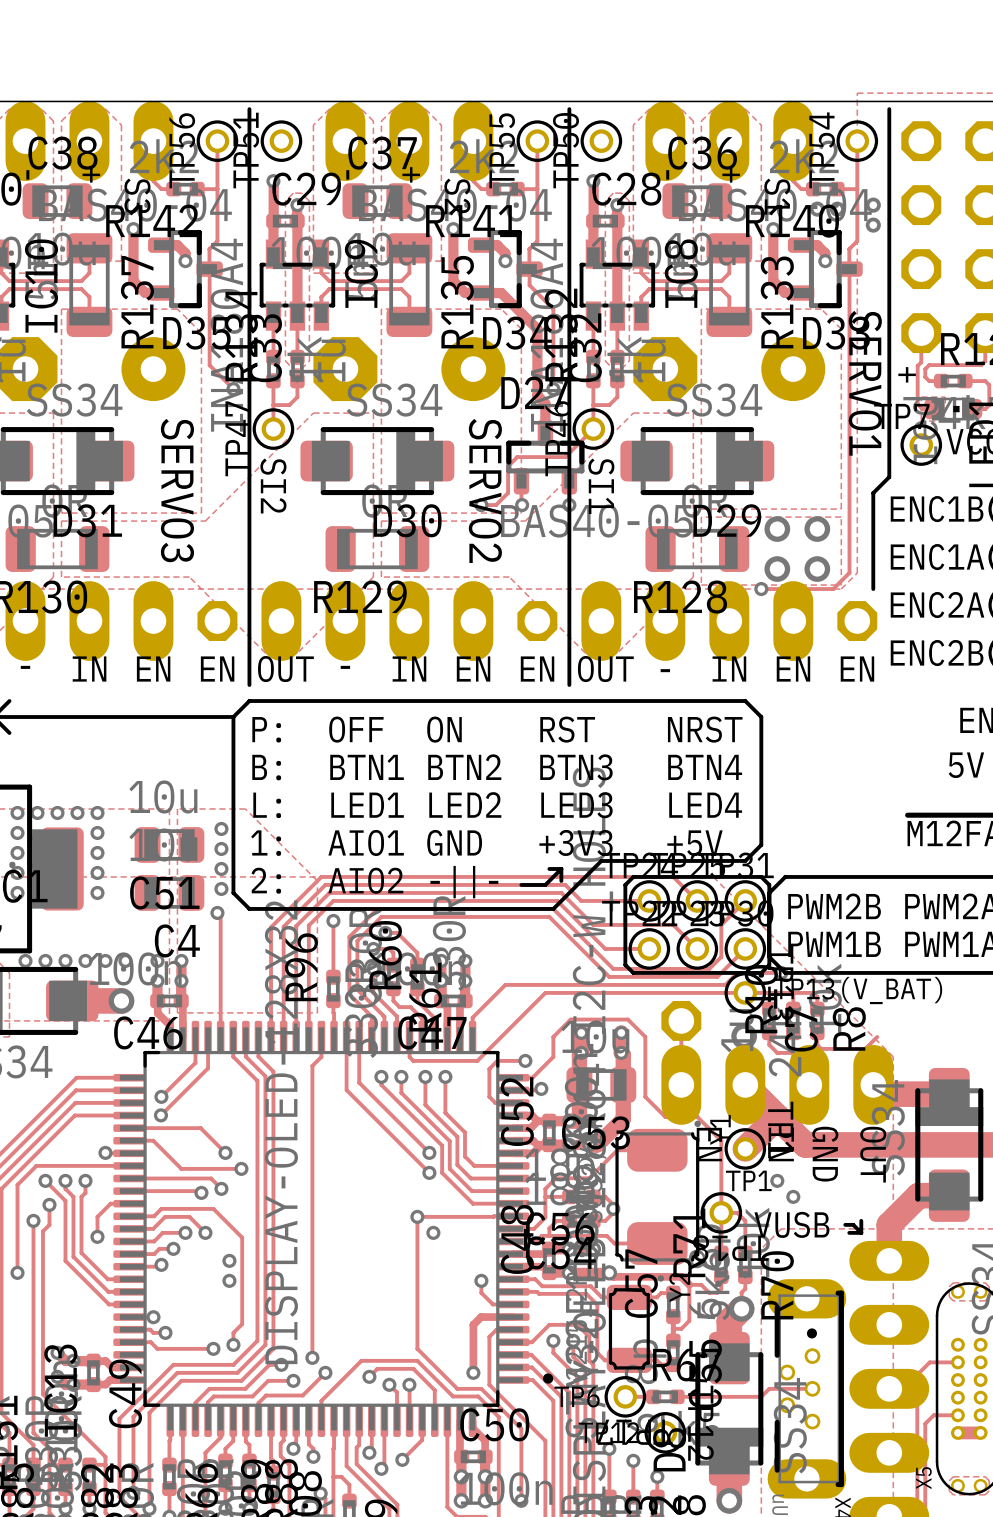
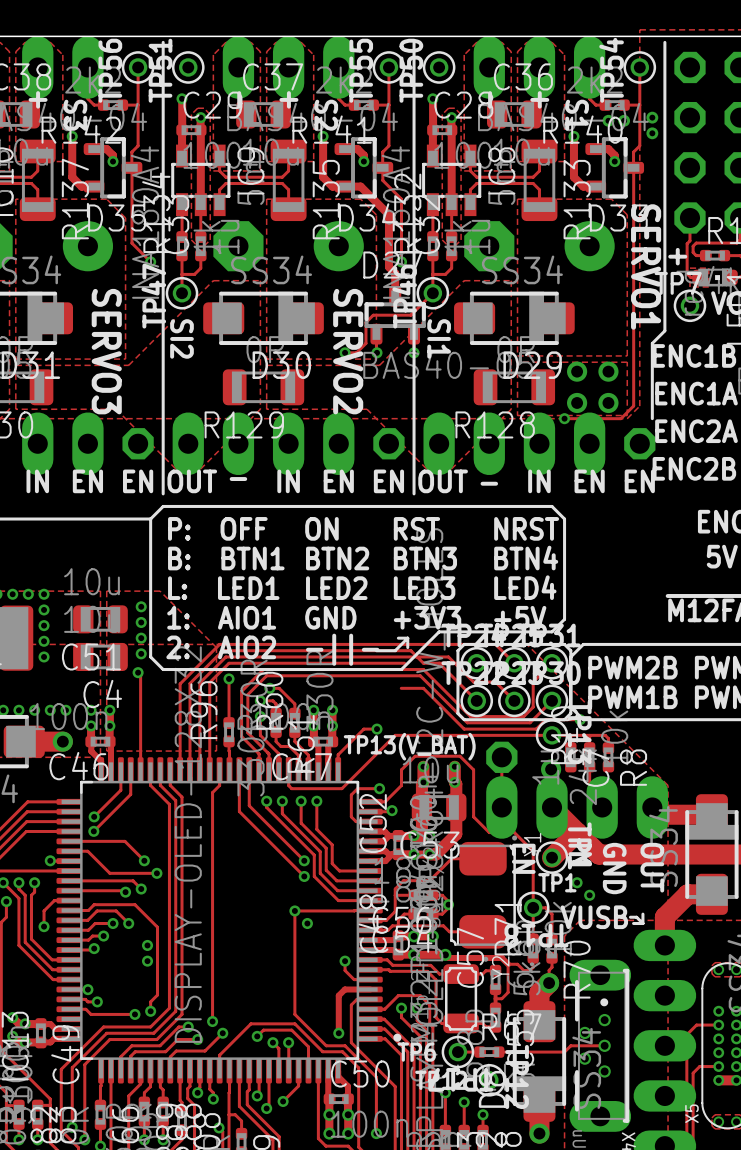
track: (561, 892) (593, 924) (645, 924) -> (407, 656) (448, 656) (473, 682)
track: (557, 900) (605, 948) (649, 948) -> (439, 663) (476, 700)
track: (553, 908) (613, 968) (641, 968) -> (401, 669) (423, 669) (470, 716)
track: (549, 916) (609, 976) (637, 976) -> (398, 675) (420, 675) (467, 722)
track: (522, 984) (633, 984) -> (401, 688) (423, 688) (464, 729)
via: none -> (377, 729)
text position: TP13(V_BAT) (858, 990) -> TP13(V_BAT) (409, 746)
track: (769, 1032) (769, 1044) (777, 1052) (793, 1052) -> none
track: (817, 1032) (817, 1044) (821, 1048) (865, 1048) (877, 1036) -> none

